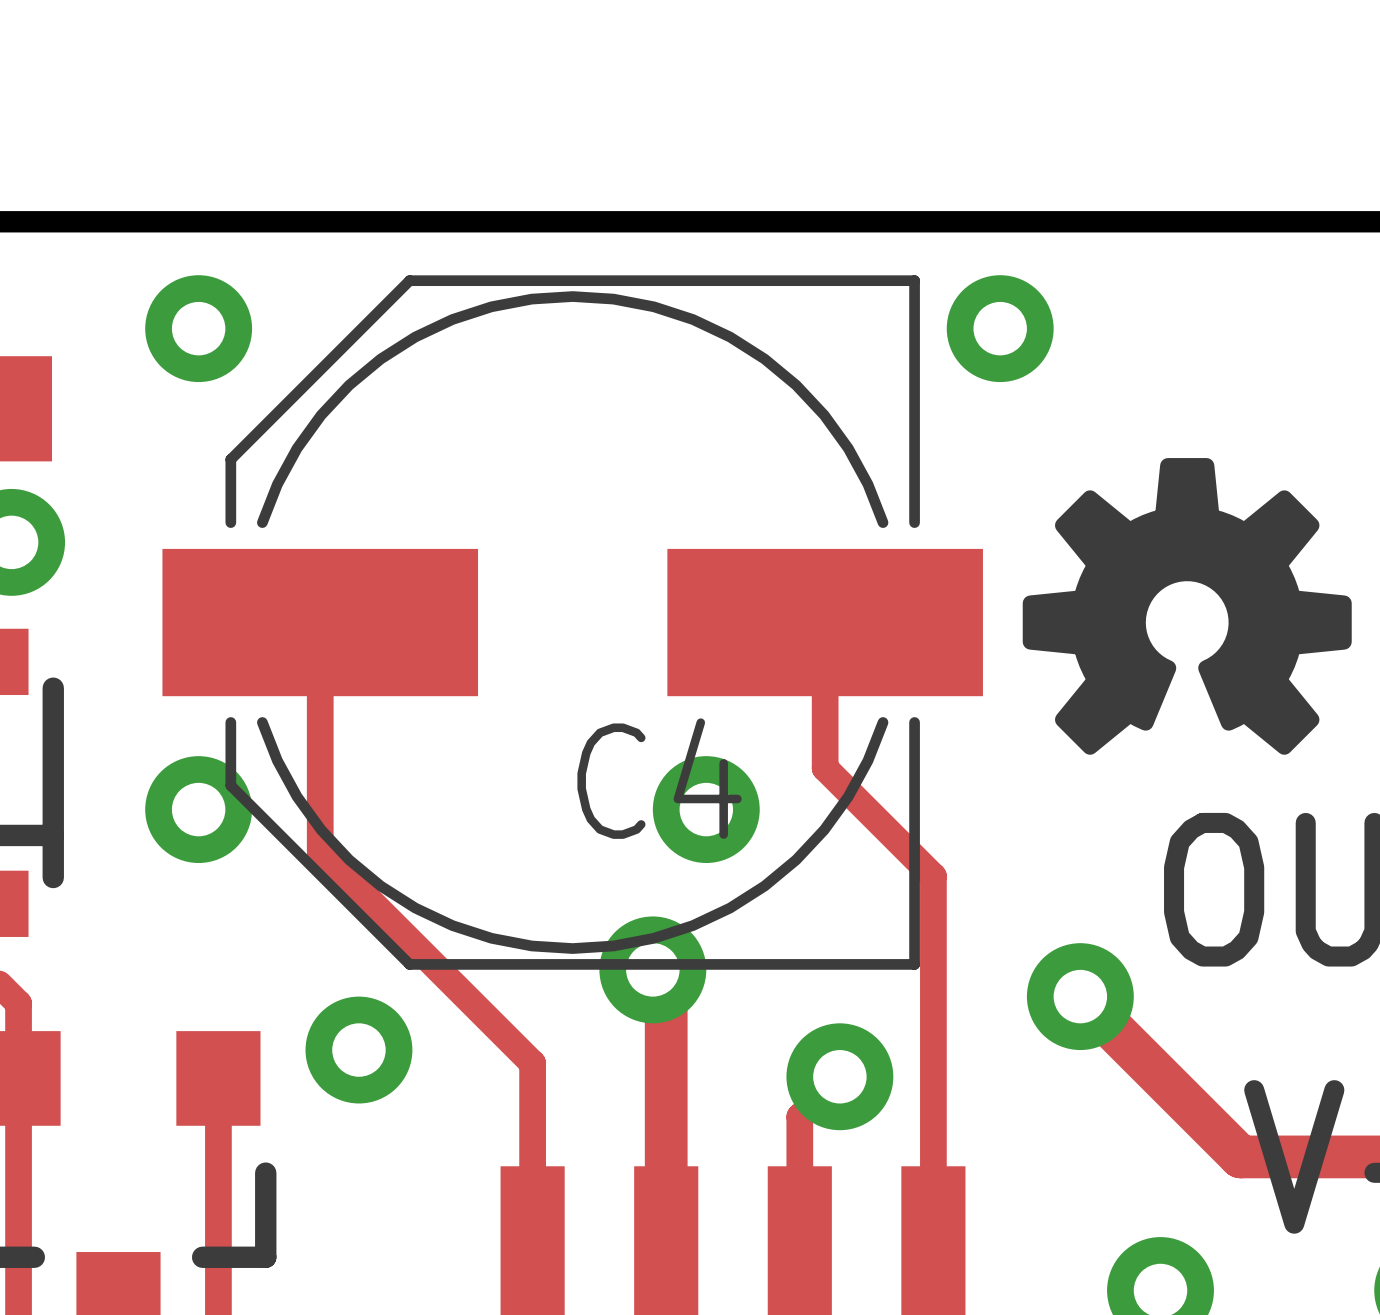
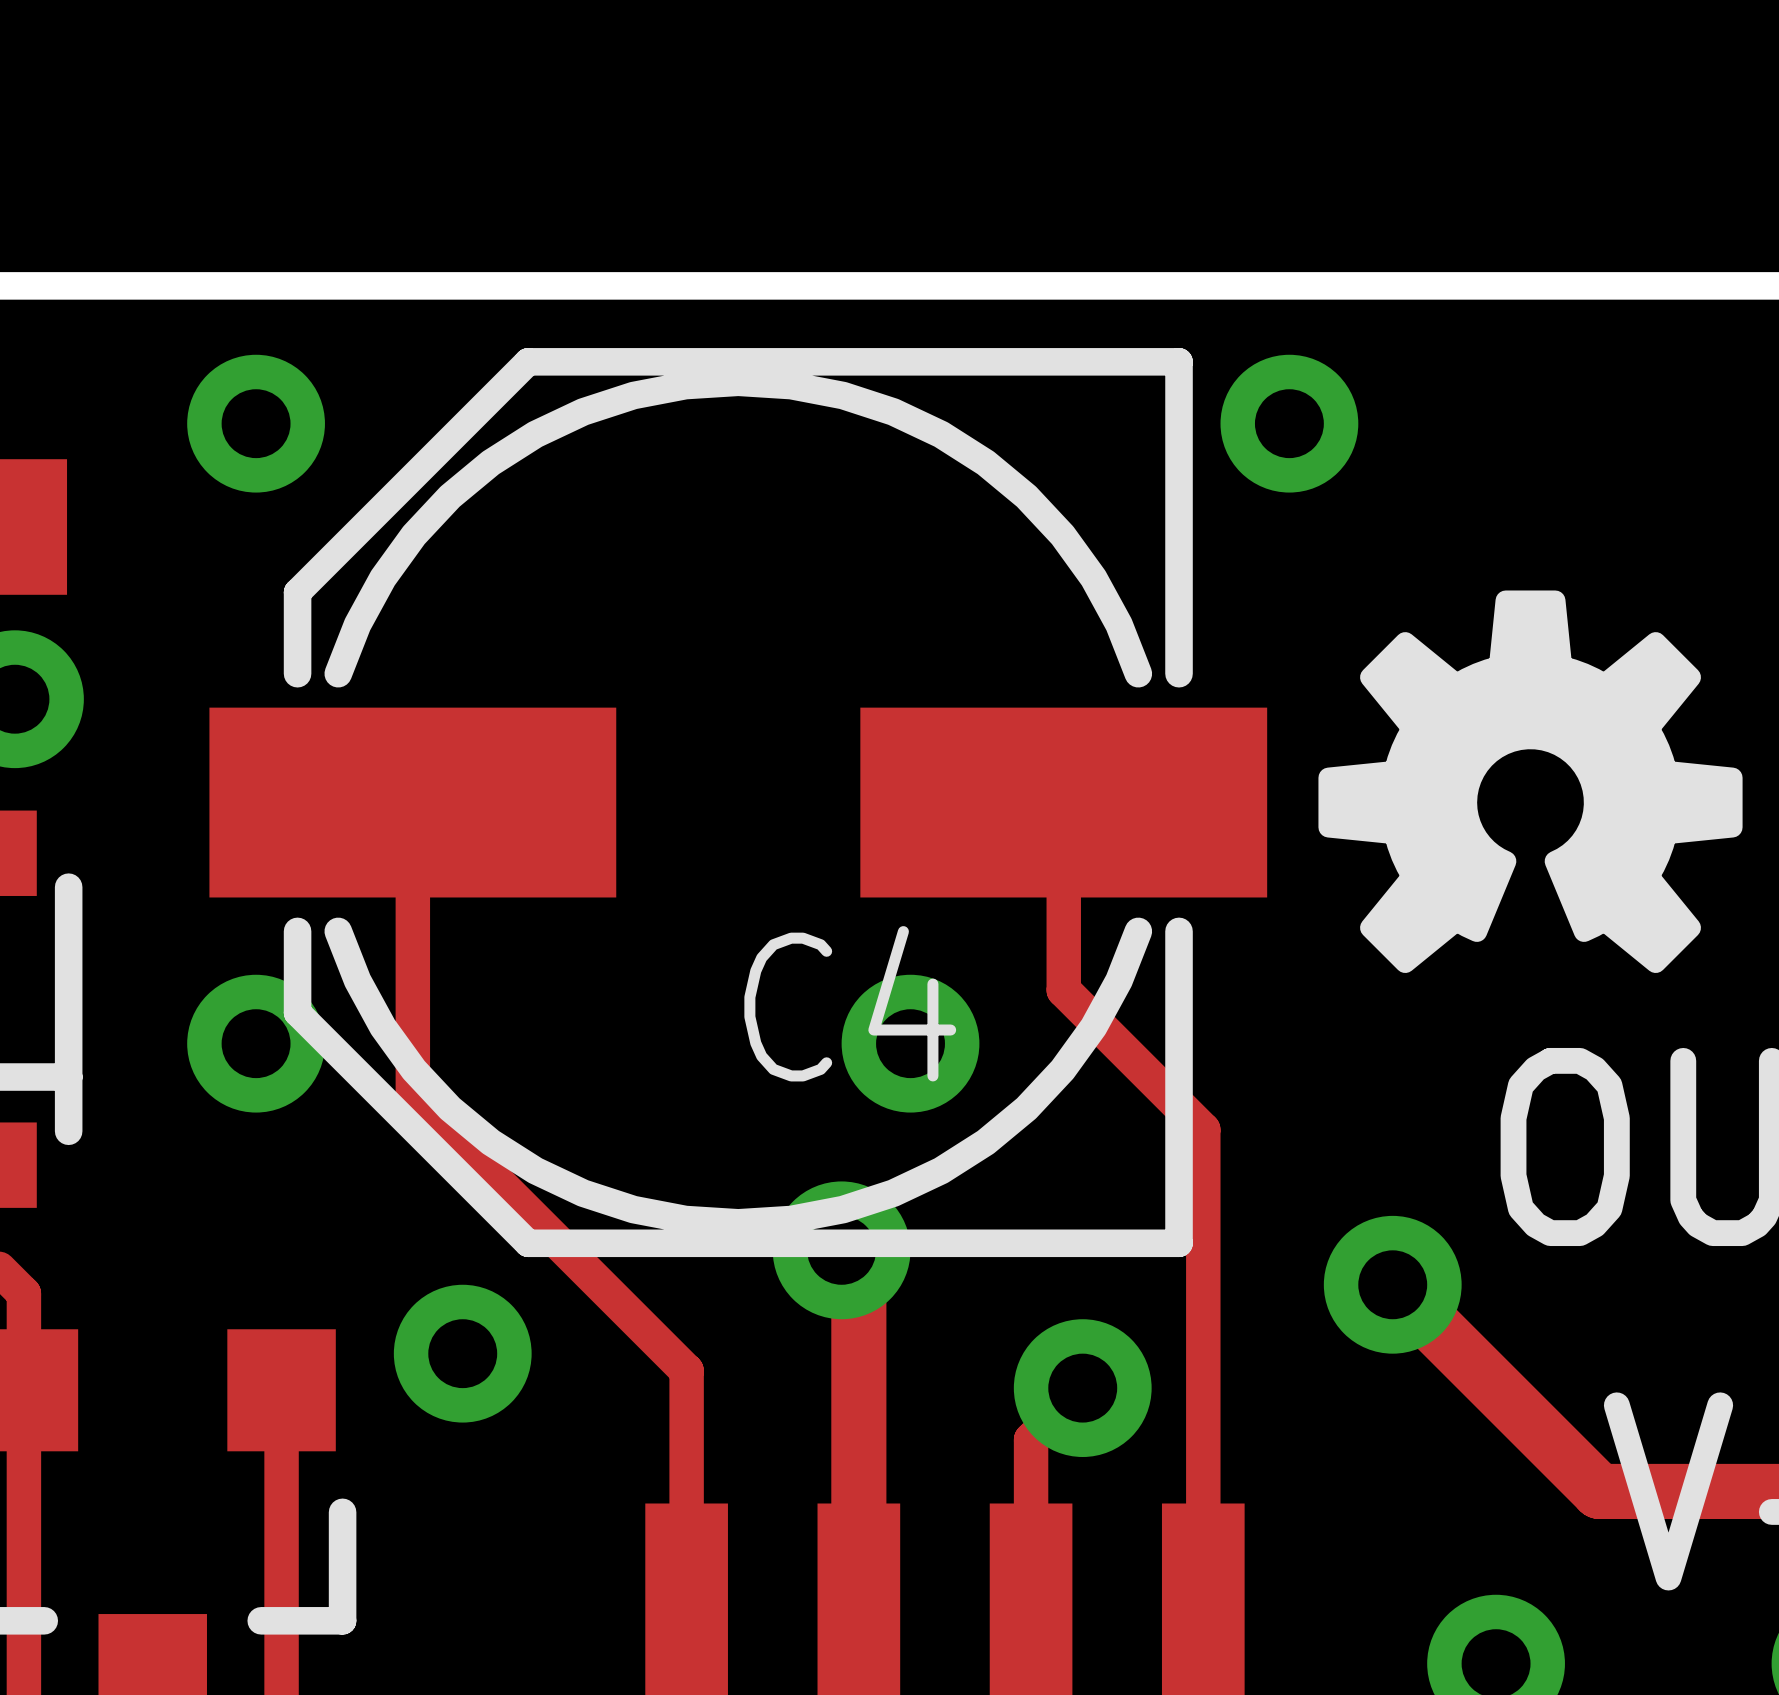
C4 footprint: [162, 275, 983, 970] -> [209, 348, 1268, 1258]

